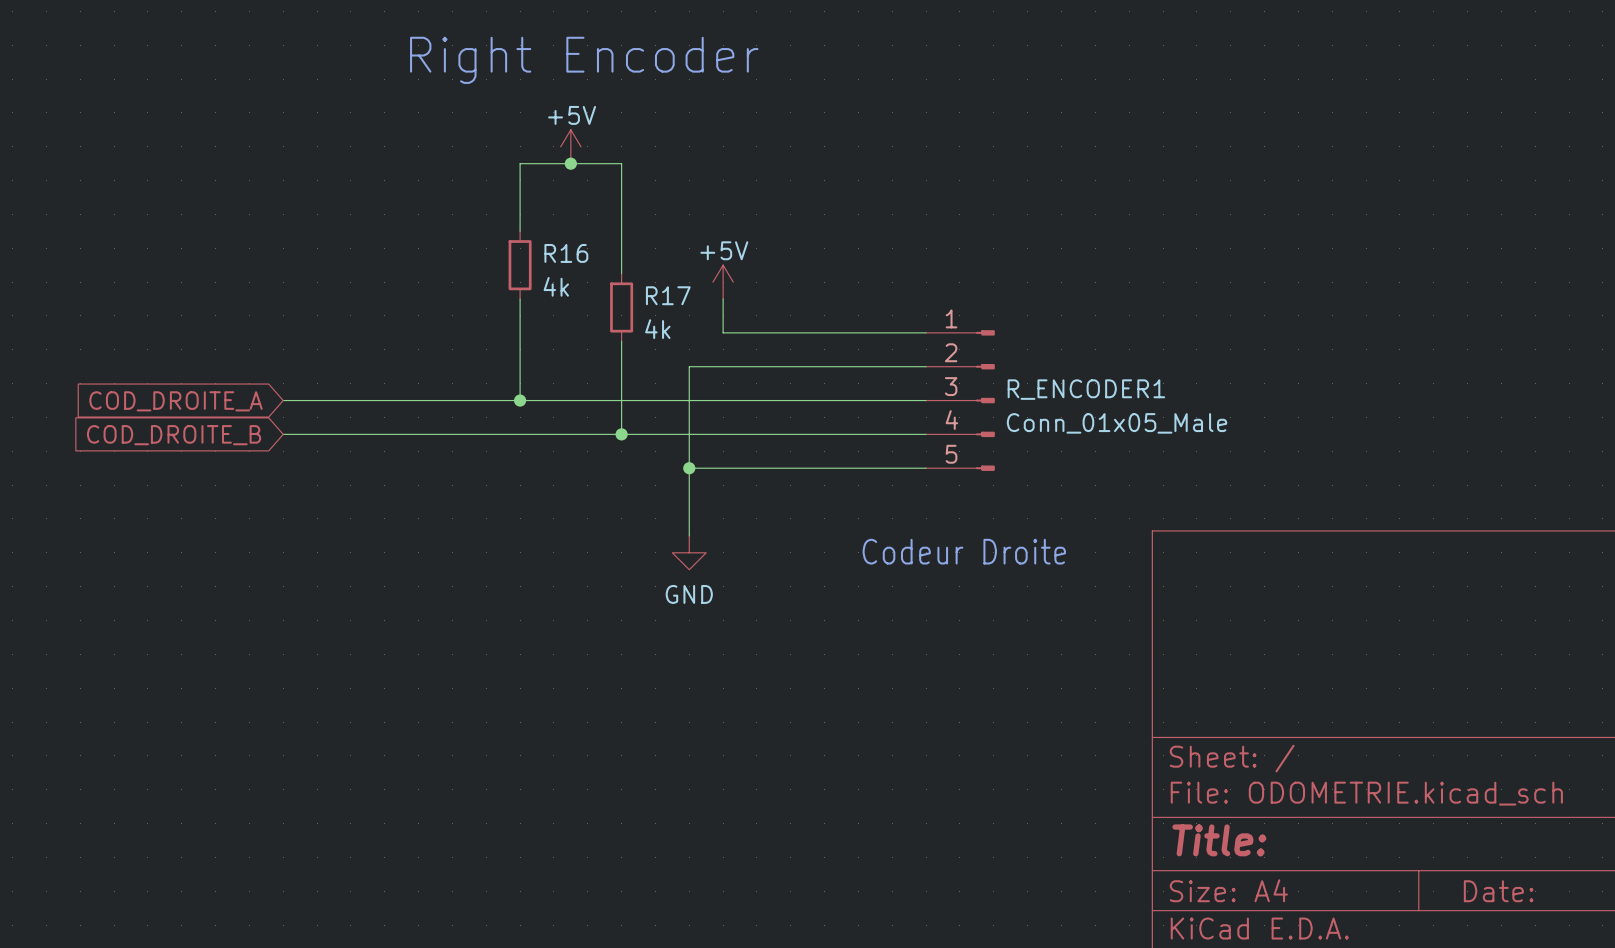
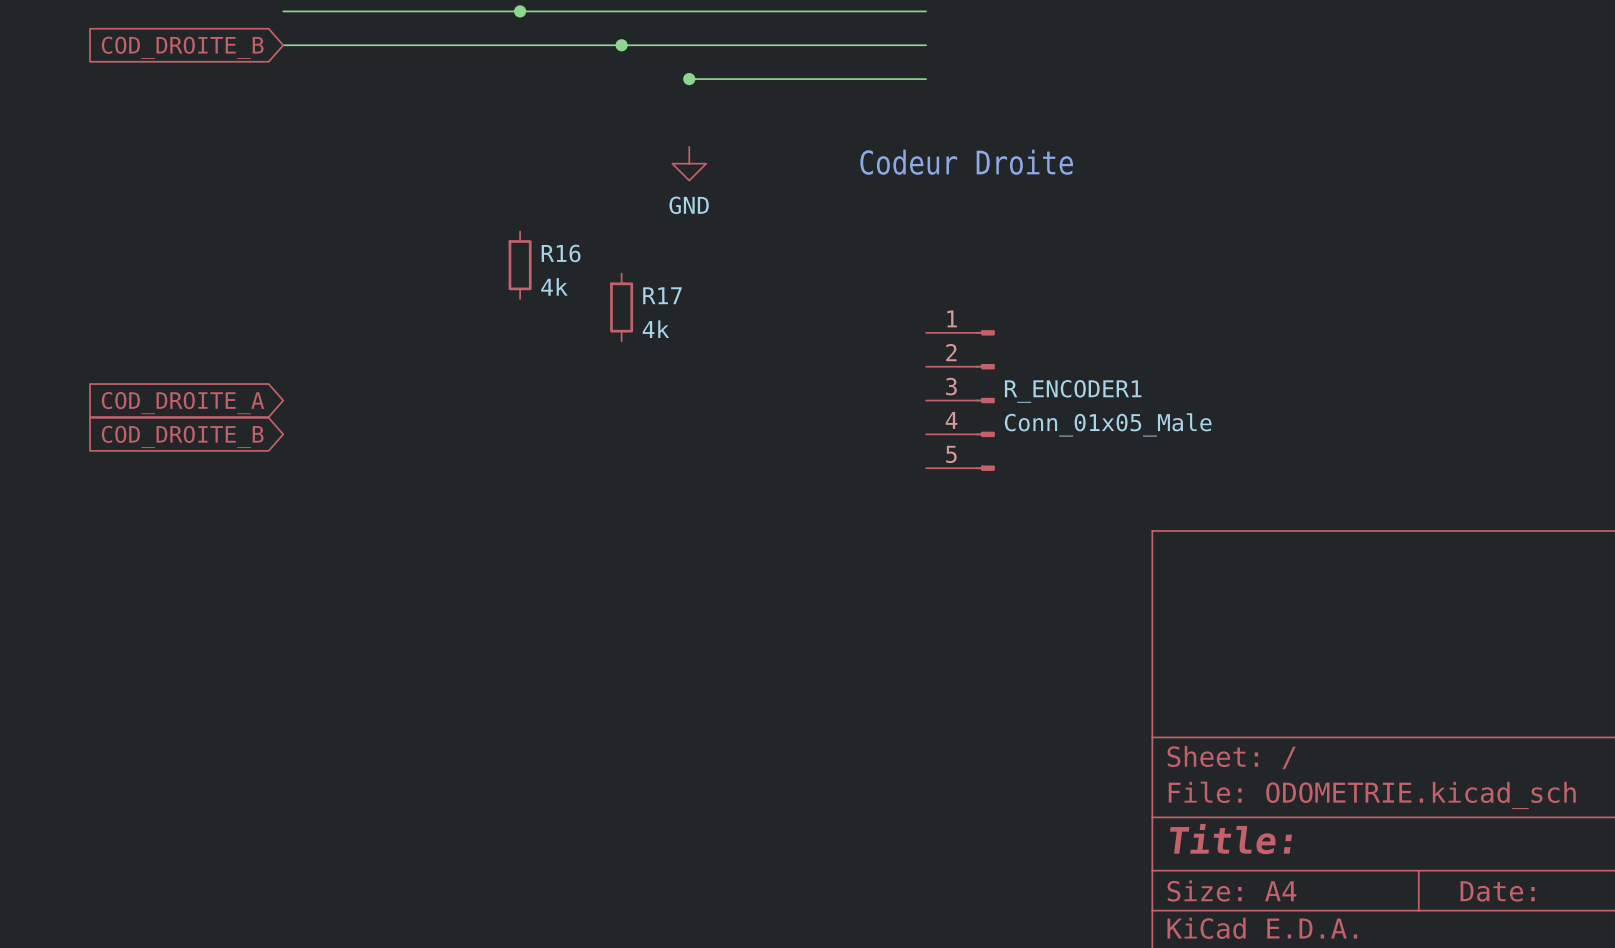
wire: none -> (283, 11) (926, 11)
junction: none -> (520, 11)
wire: none -> (283, 45) (926, 45)
junction: none -> (621, 45)
global label: none -> COD_DROITE_B (182, 47)
text: Right Encoder (584, 60) -> none
wire: none -> (689, 79) (926, 79)
junction: none -> (689, 79)
power symbol: +5V (570, 146) -> none
text: none -> Codeur Droite (966, 162)
junction: (570, 163) -> none
power symbol: none -> GND (689, 163)
wire: (520, 231) (520, 163) (621, 163) (621, 273) -> none
power symbol: +5V (723, 282) -> none
wire: (520, 299) (520, 400) -> none
wire: (723, 299) (723, 332) (926, 332) -> none
wire: (621, 341) (621, 434) -> none
wire: (926, 366) (689, 366) (689, 535) -> none
wire: (283, 400) (926, 400) -> none
junction: (520, 400) -> none
wire: (283, 434) (926, 434) -> none
junction: (621, 434) -> none
wire: (689, 468) (926, 468) -> none
junction: (689, 468) -> none
text: Codeur Droite (964, 551) -> none
power symbol: GND (689, 552) -> none

